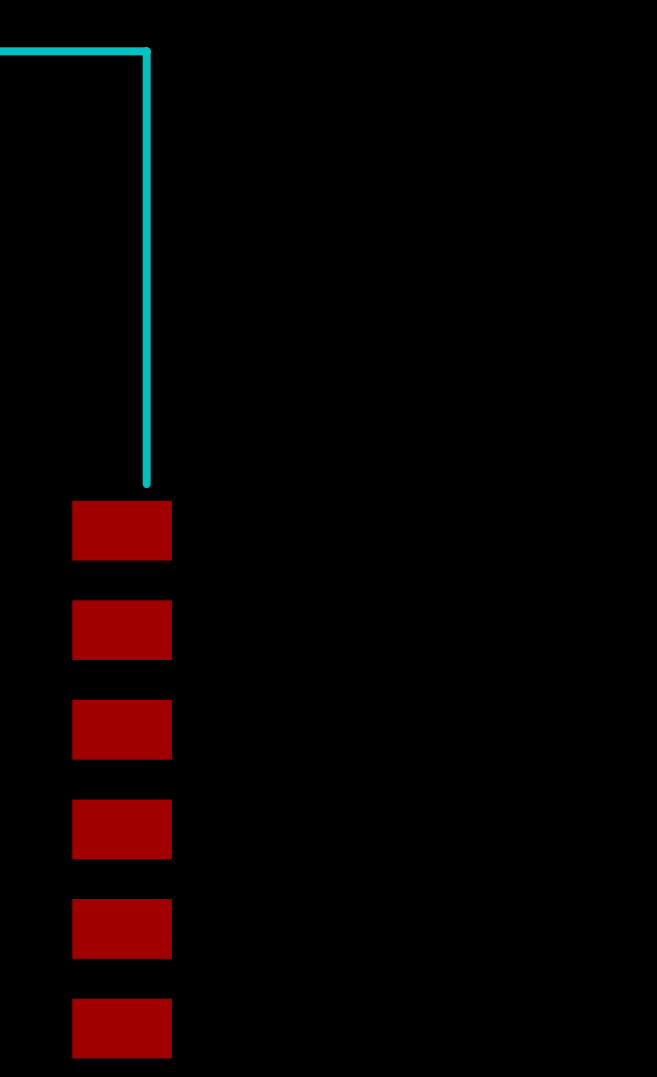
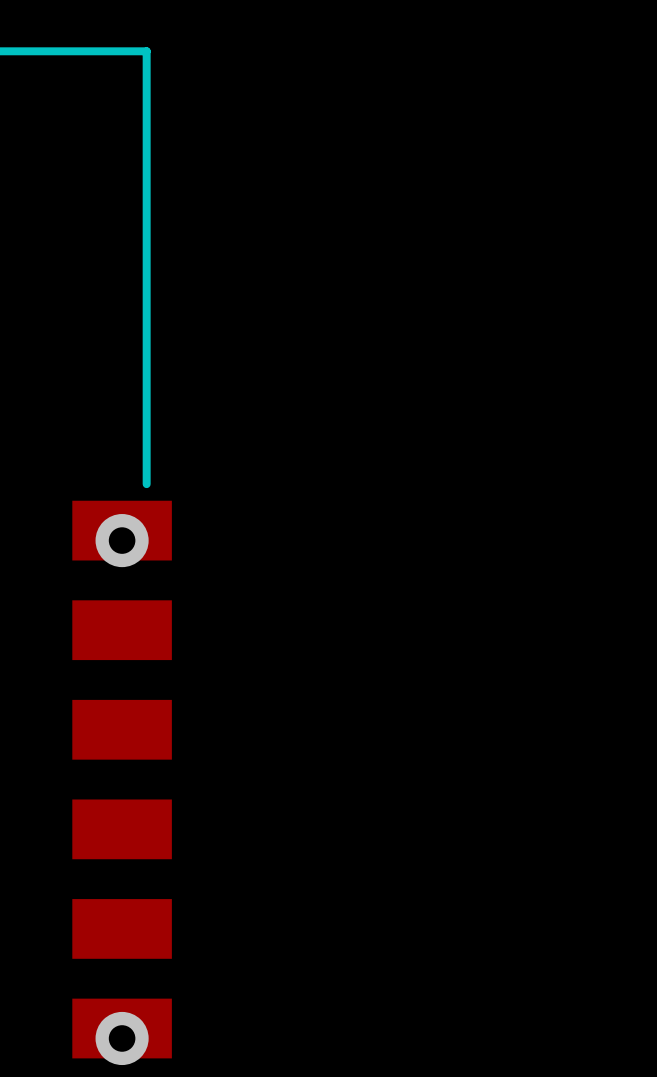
via: none -> (122, 540)
via: none -> (122, 1038)

